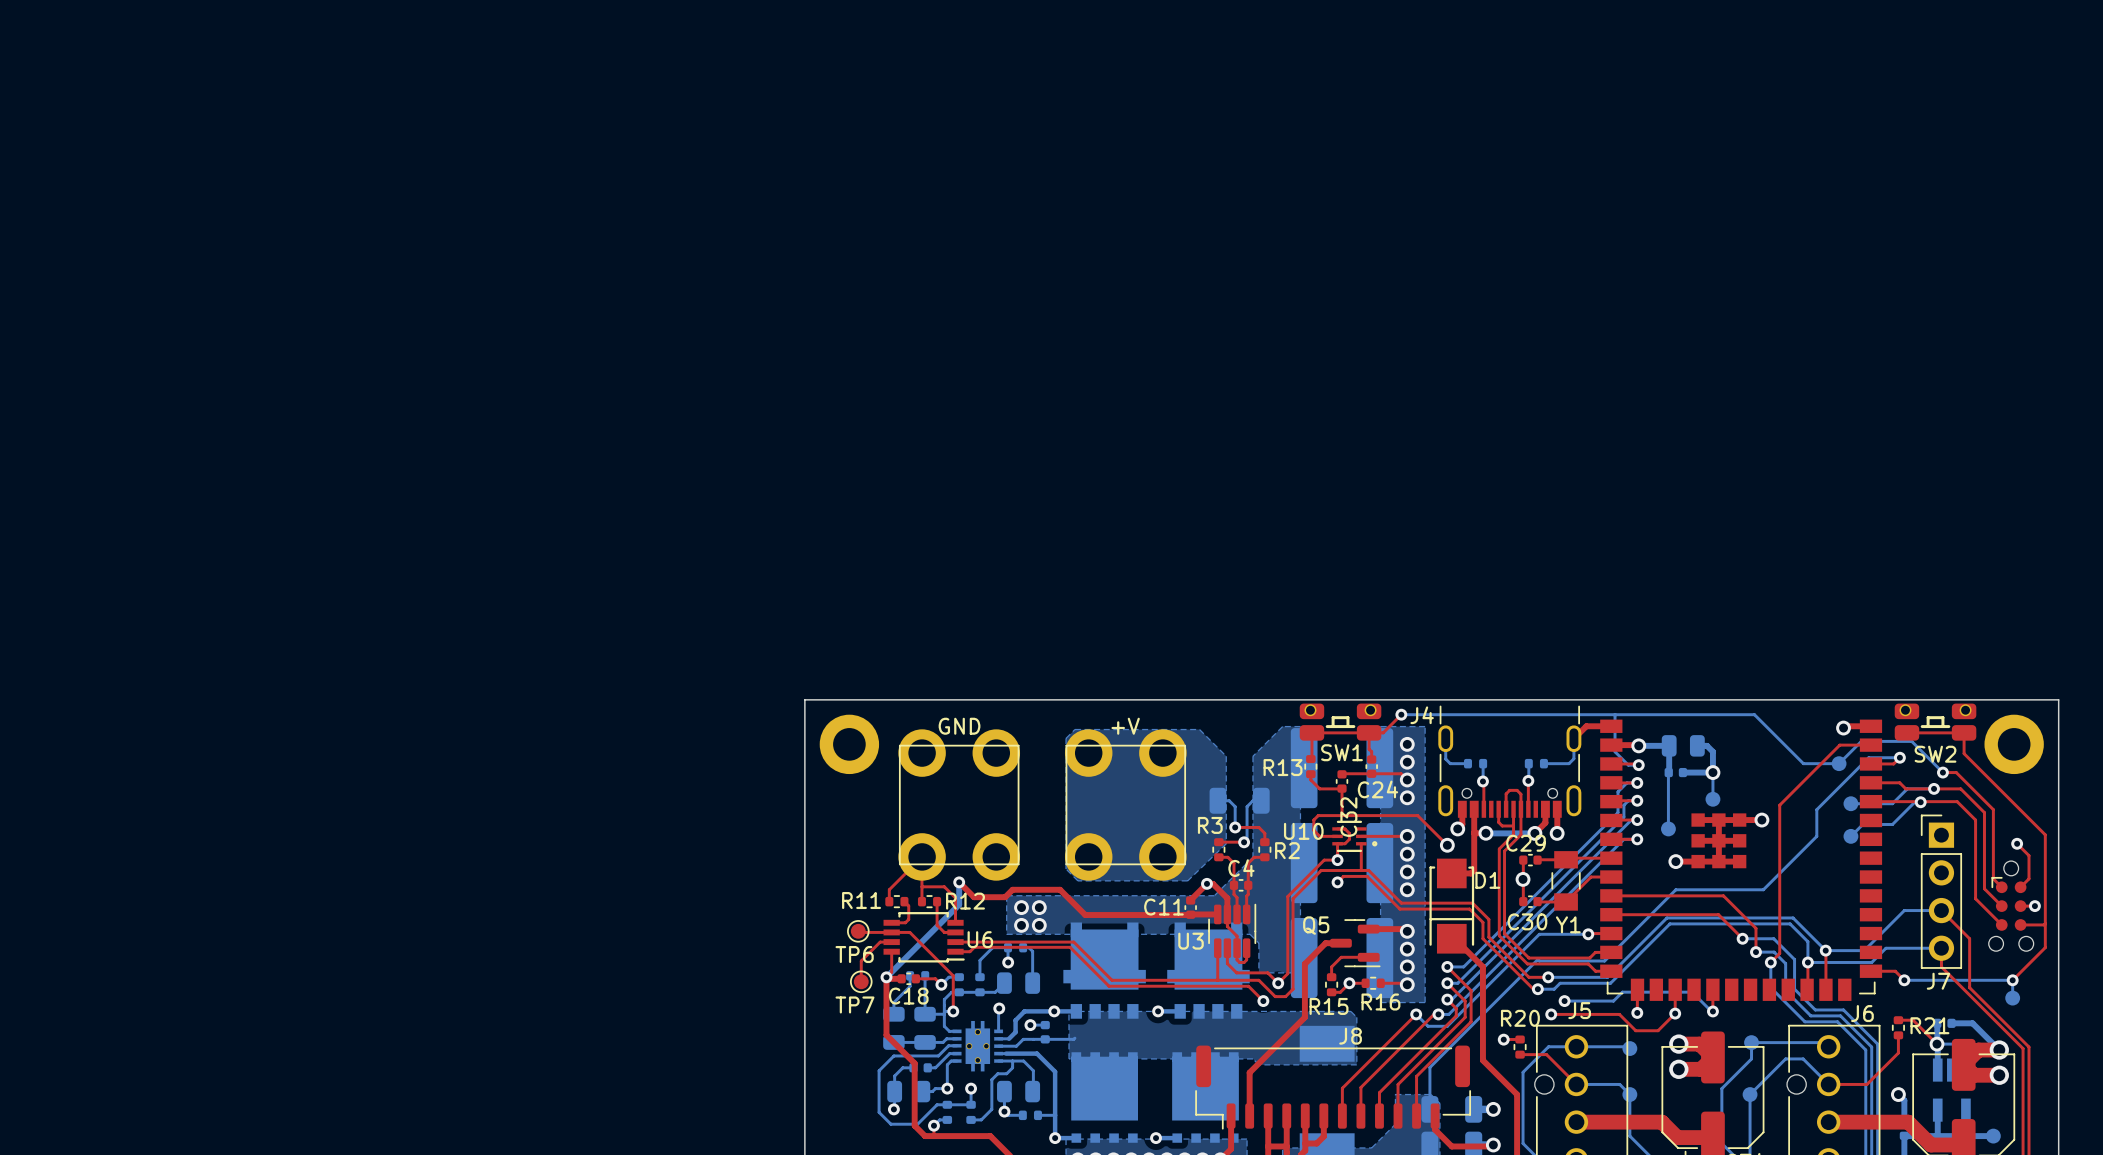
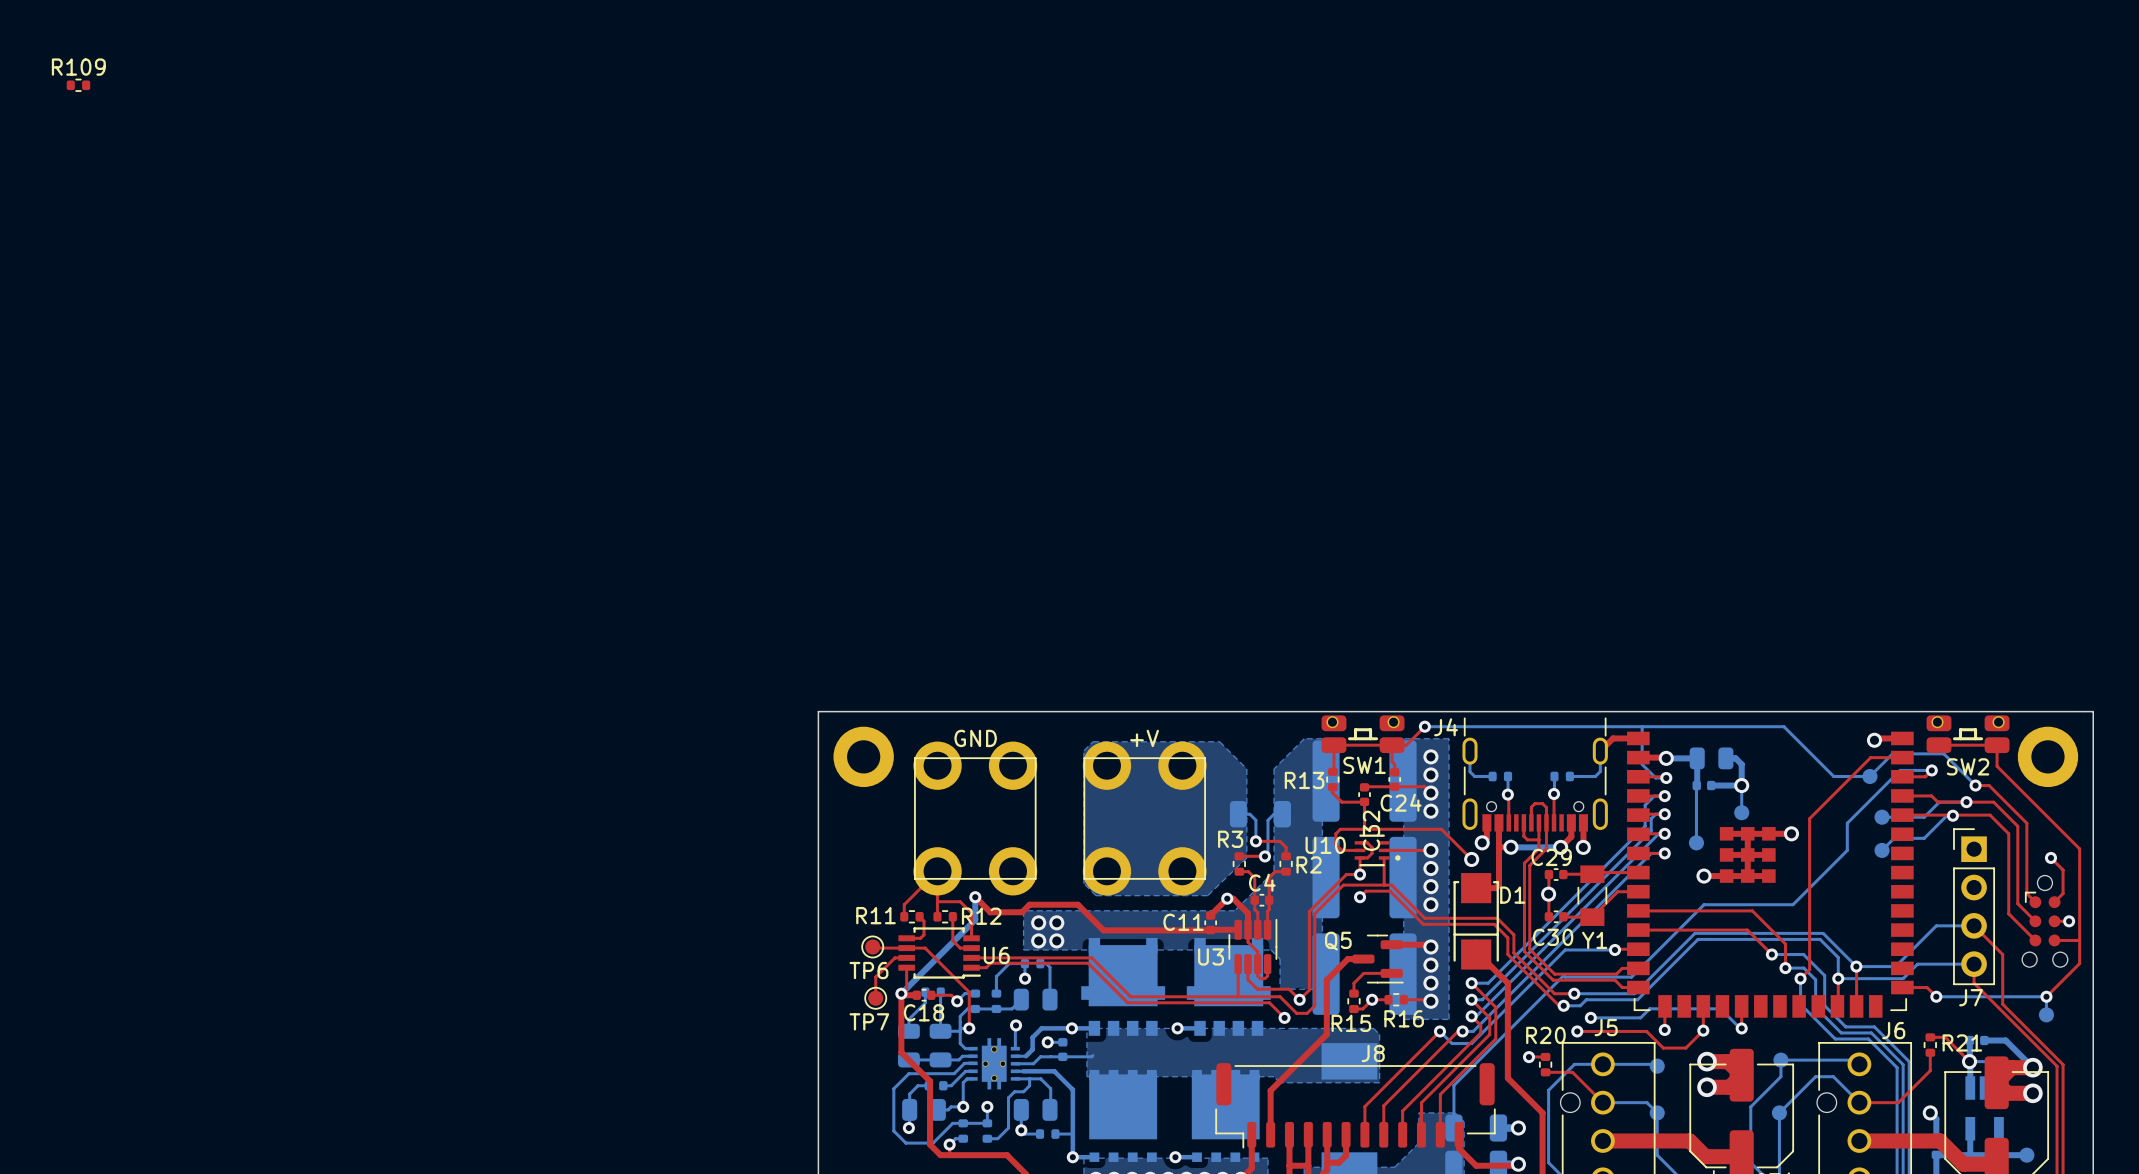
R109: none -> (78, 85)

